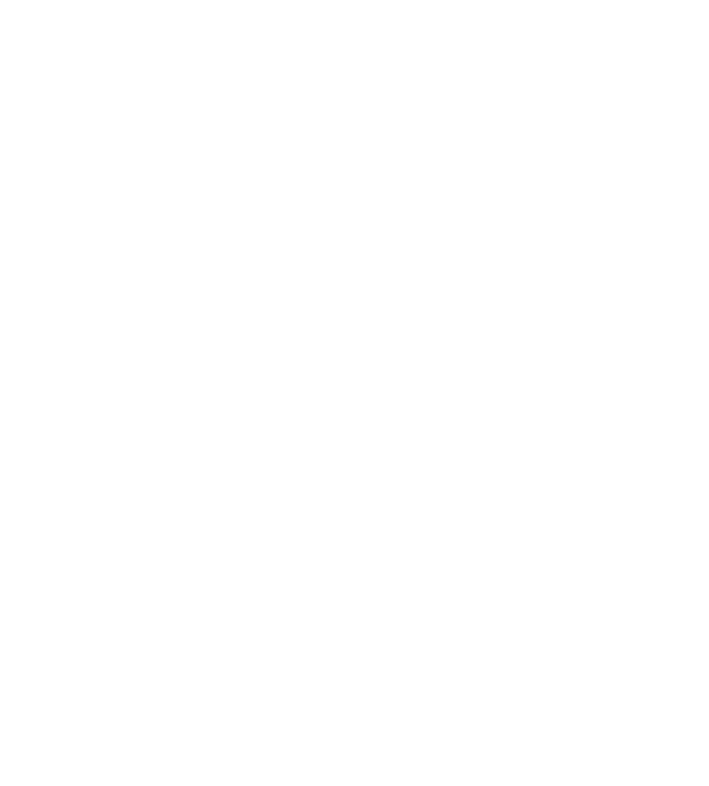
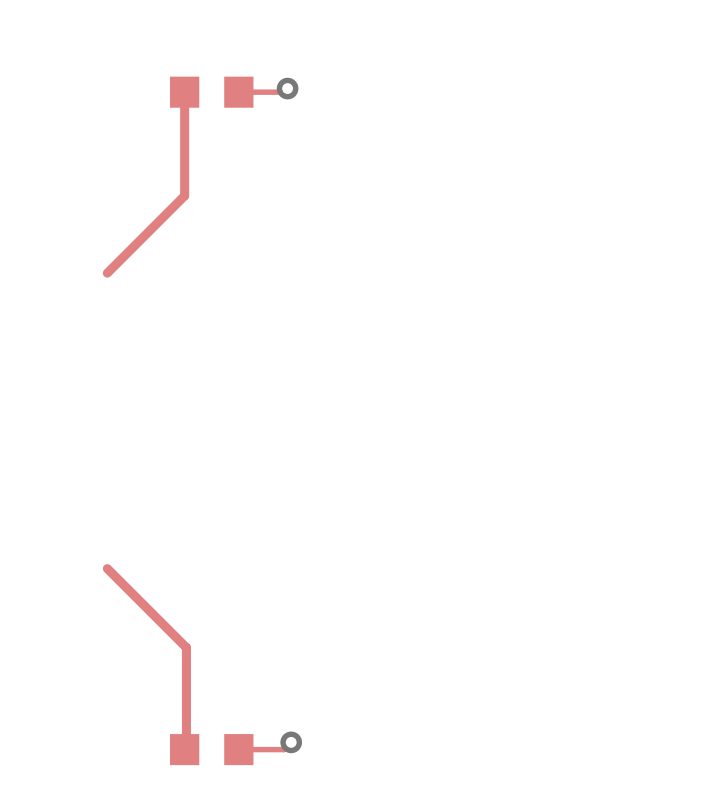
top track: none -> (287, 88) (283, 92) (238, 92)
via: none -> (287, 88)
top track: none -> (184, 92) (184, 195) (107, 273)
part: none -> (211, 92)
top track: none -> (107, 568) (186, 647) (186, 747) (184, 749)
top track: none -> (291, 742) (283, 749) (238, 749)
via: none -> (291, 742)
part: none -> (211, 749)

